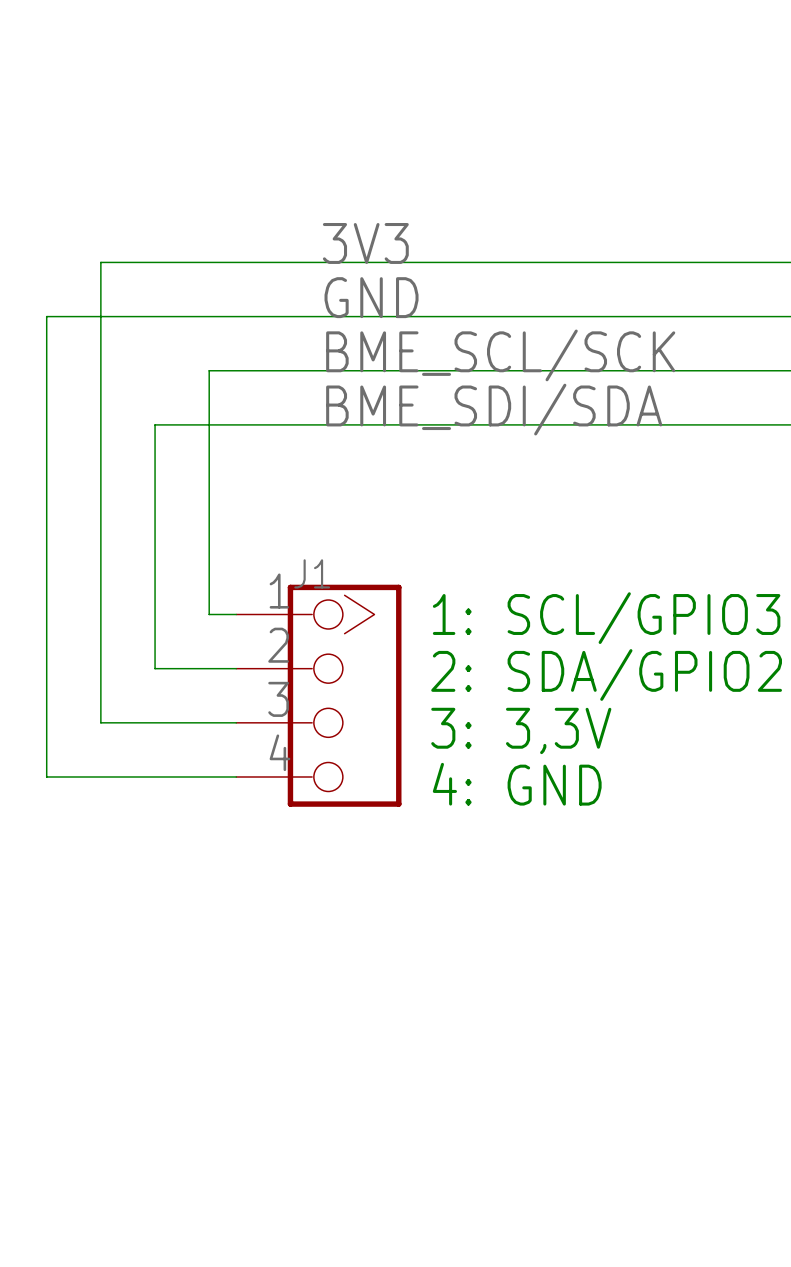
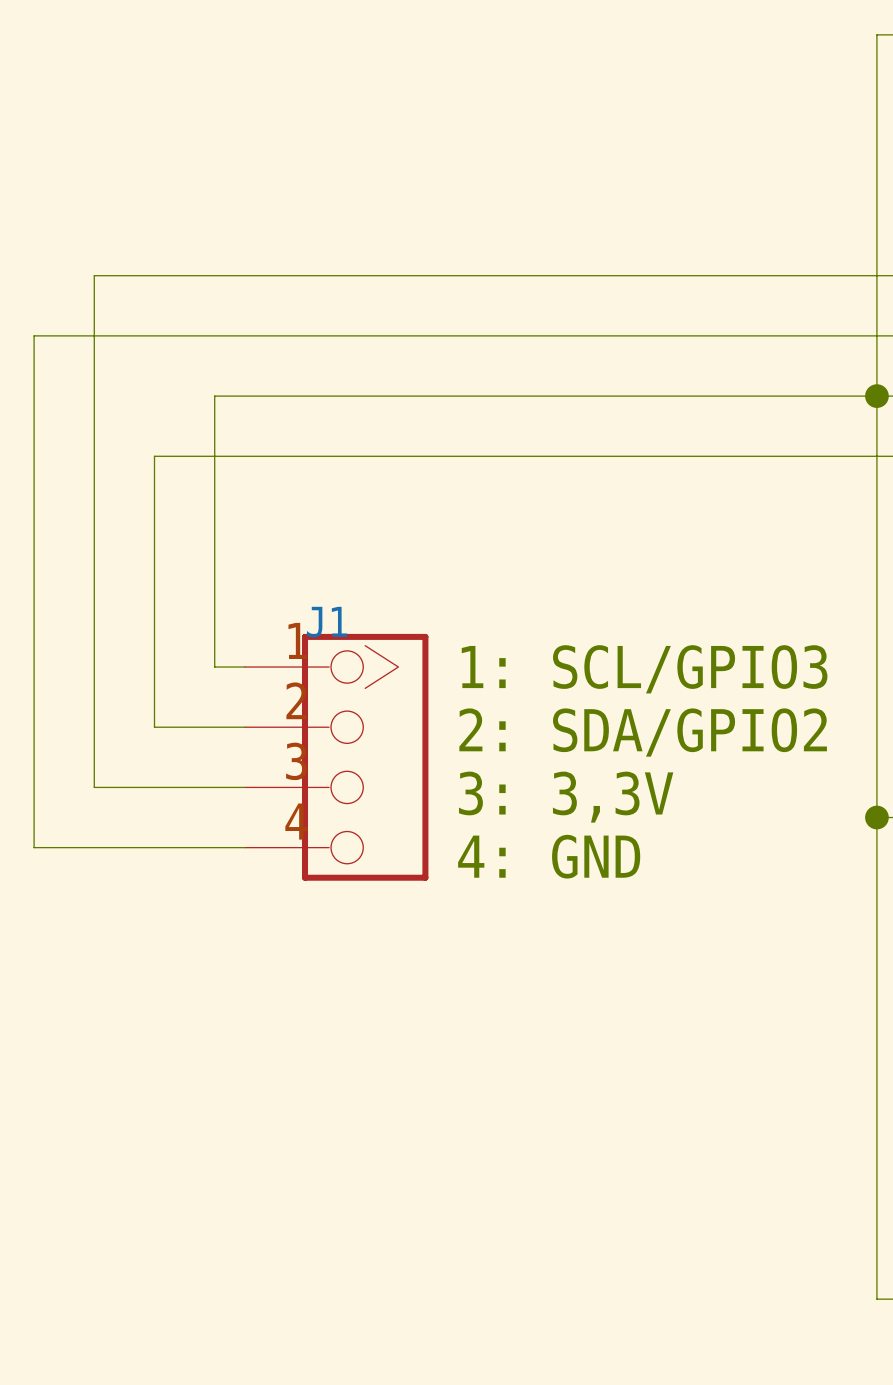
label: 3V3 (365, 243) -> none
label: GND (371, 297) -> none
label: BME_SCL/SCK (500, 355) -> none
label: BME_SDI/SDA (494, 409) -> none

